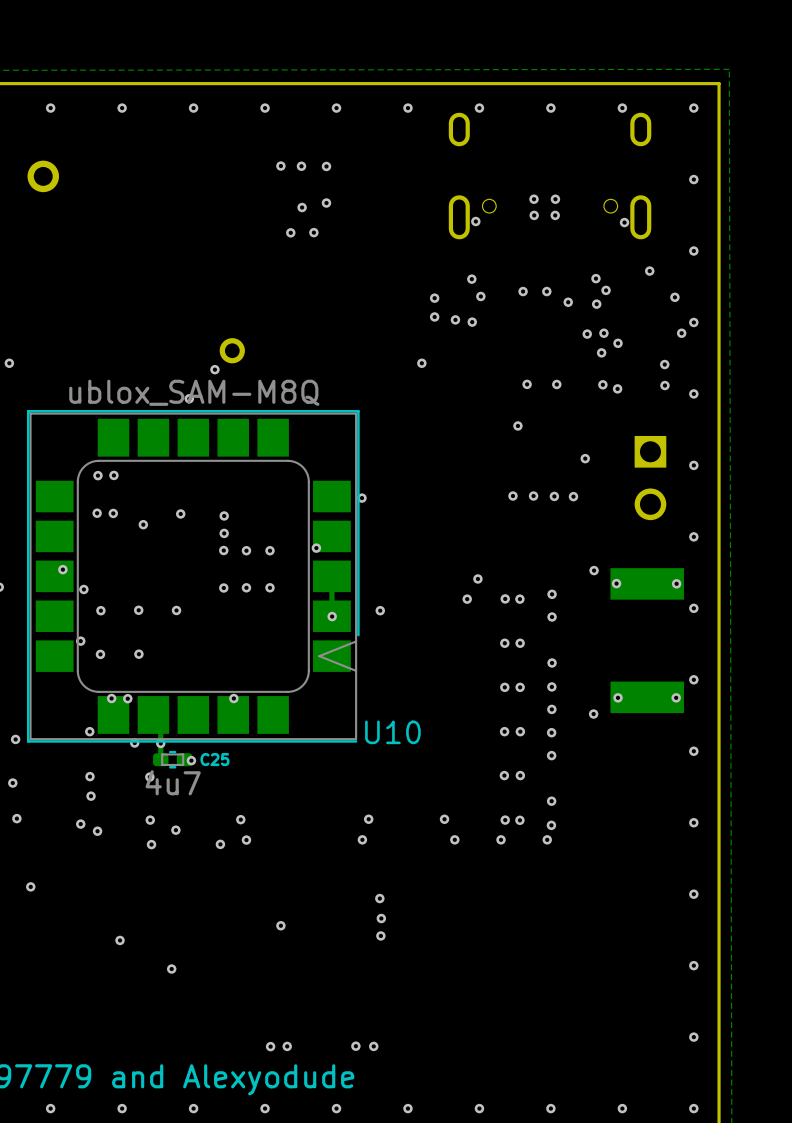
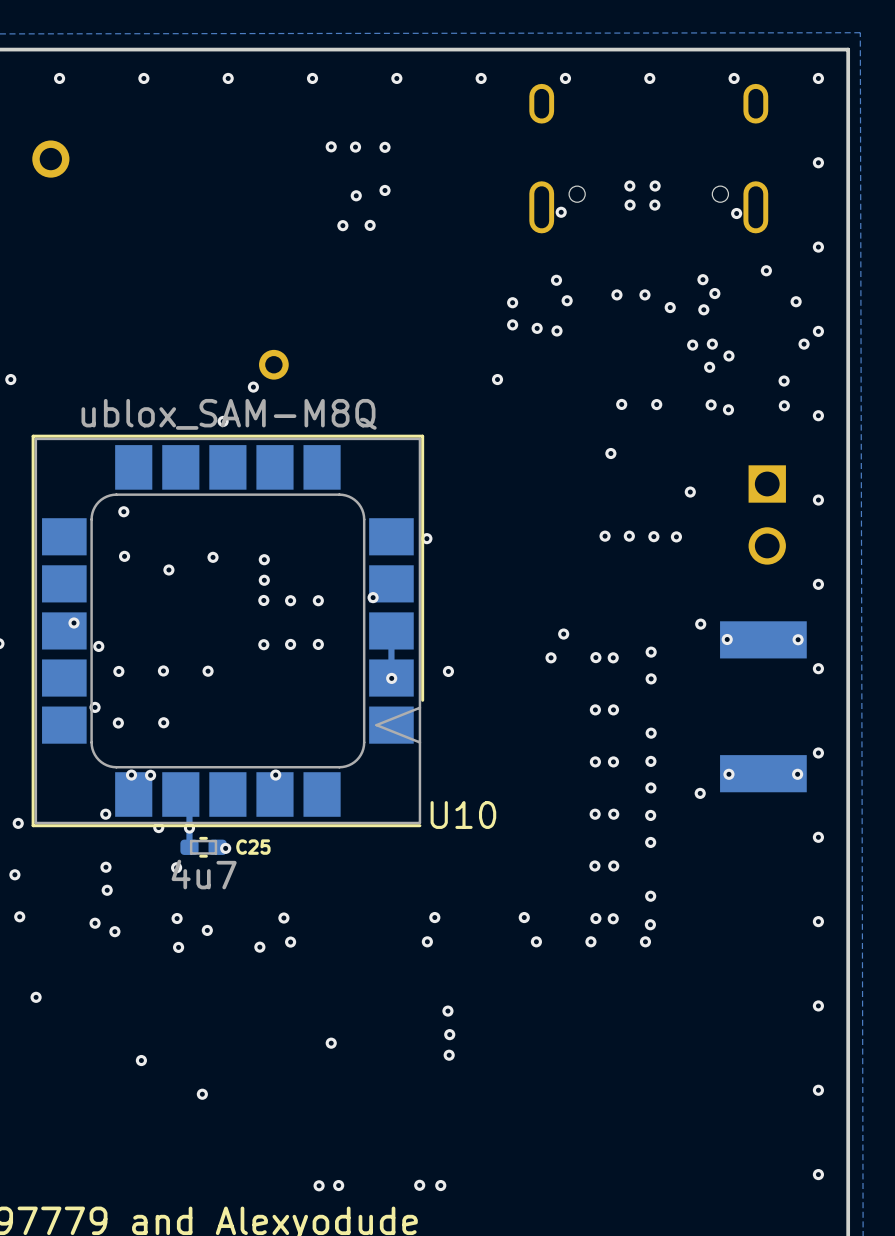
via: (97, 475) -> none
via: none -> (123, 511)
via: (113, 475) -> none
via: (97, 513) -> none
via: none -> (124, 556)
via: (113, 513) -> none

